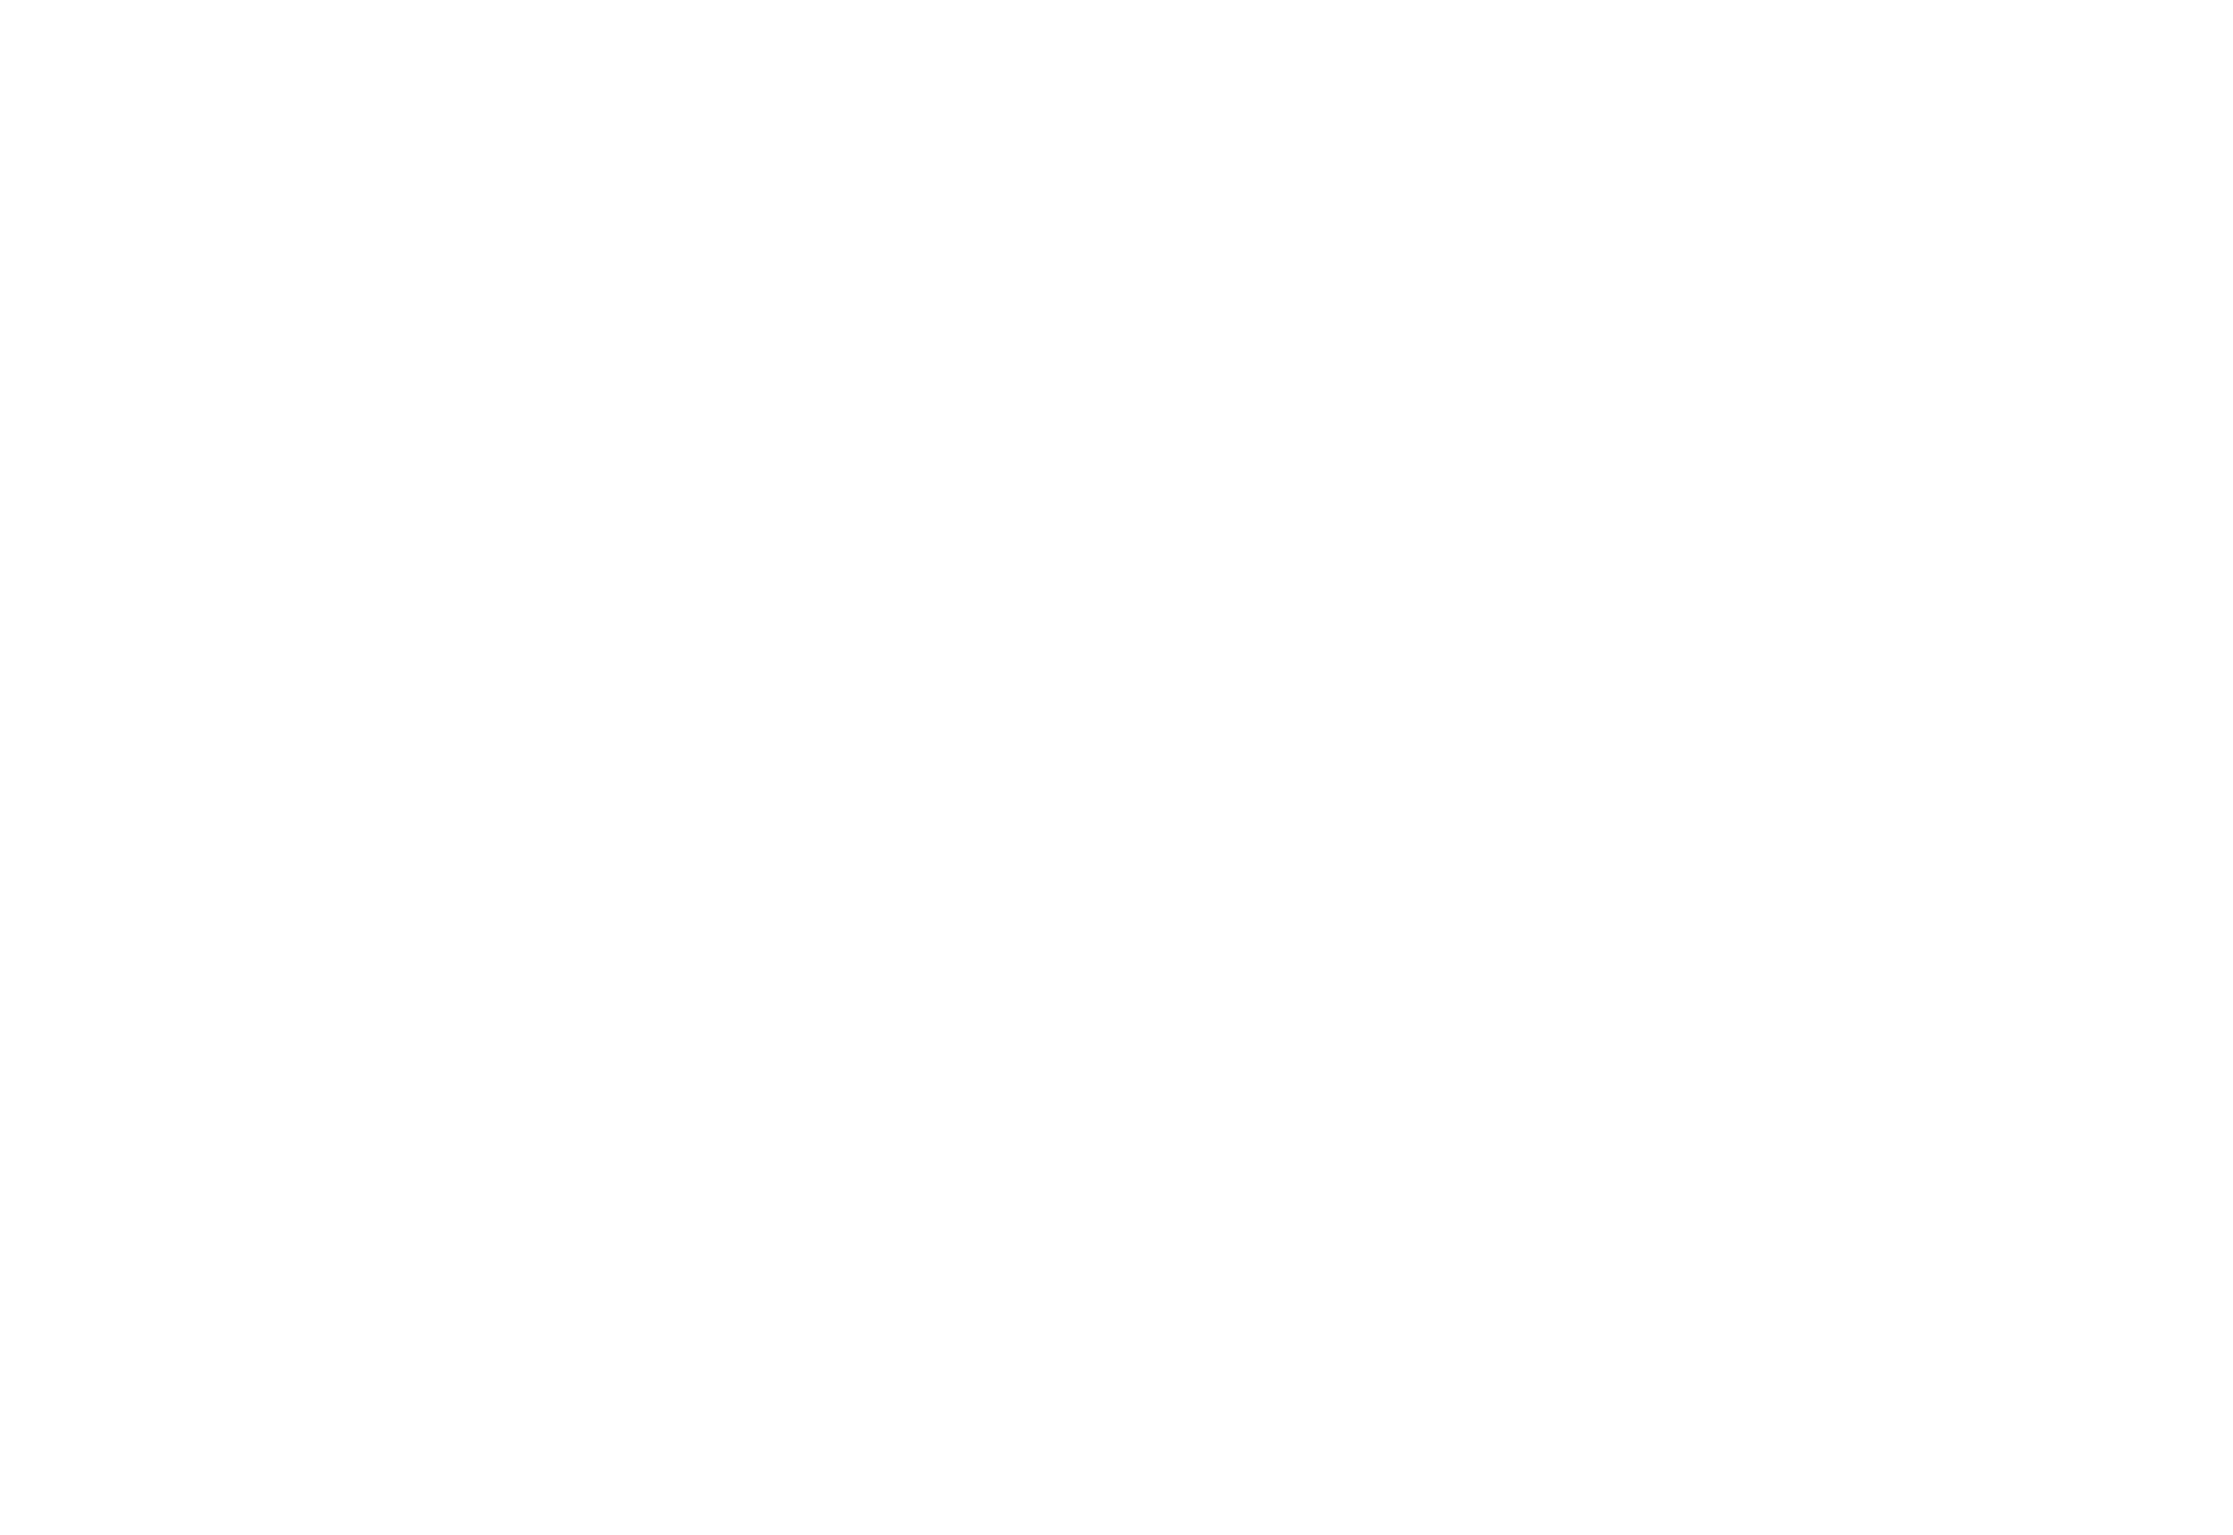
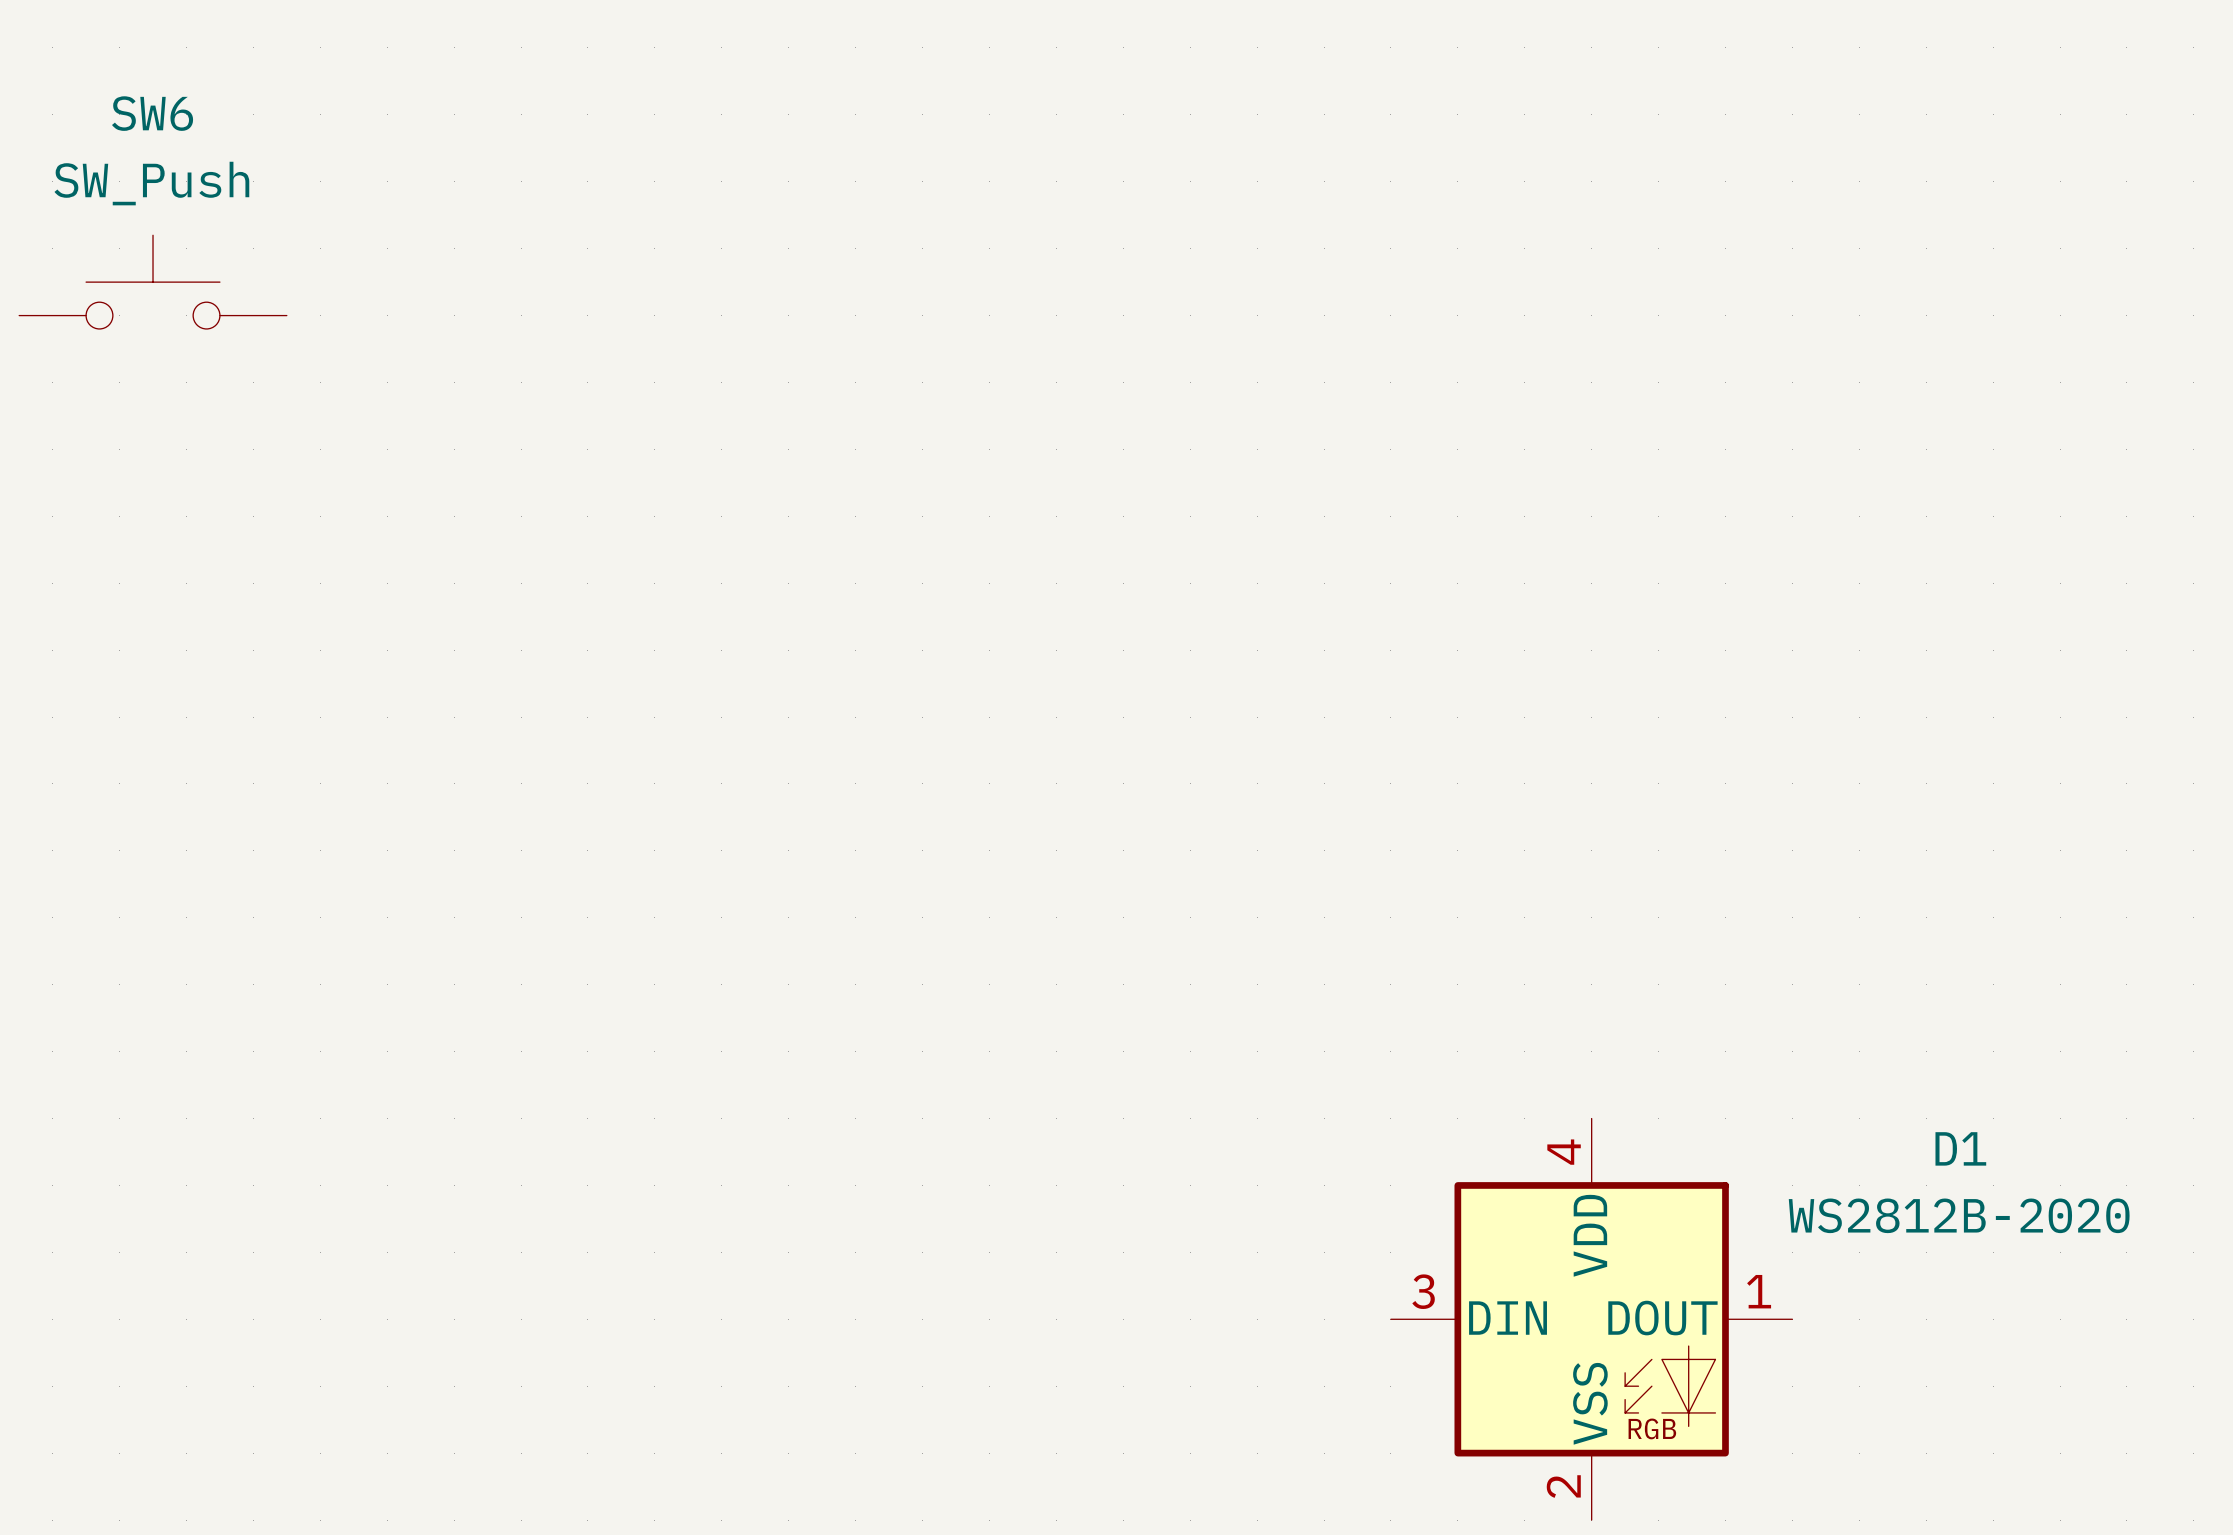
SW6: none -> SW_Push (153, 282)
D1: none -> WS2812B-2020 (1591, 1319)

